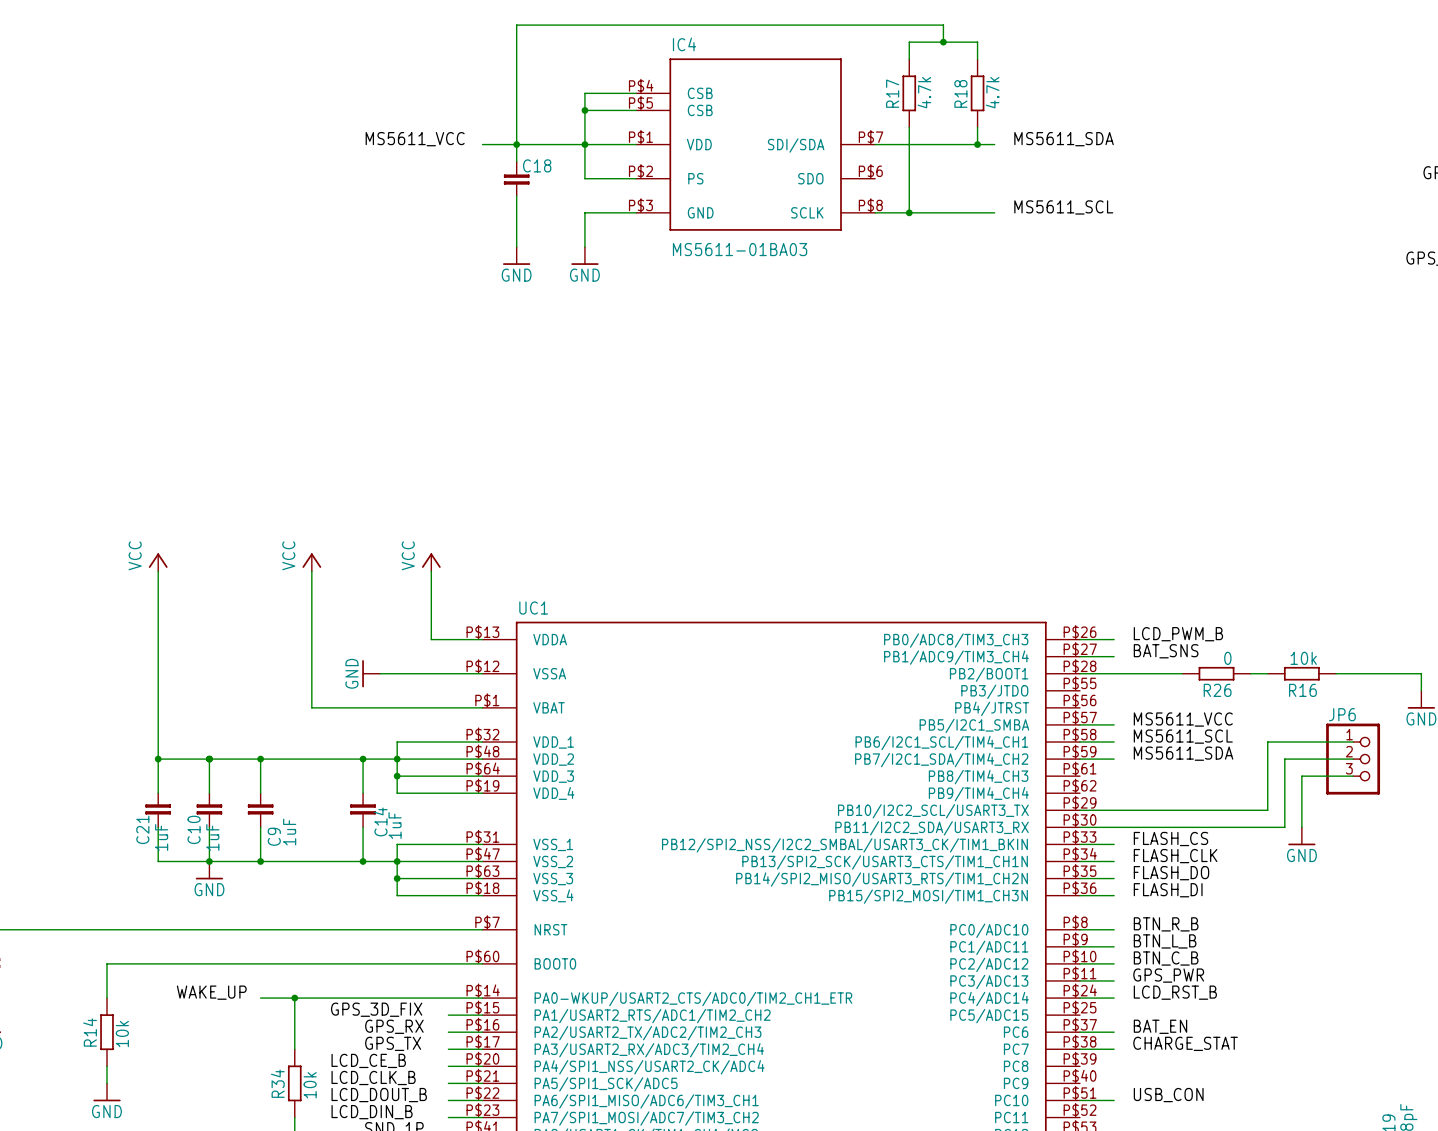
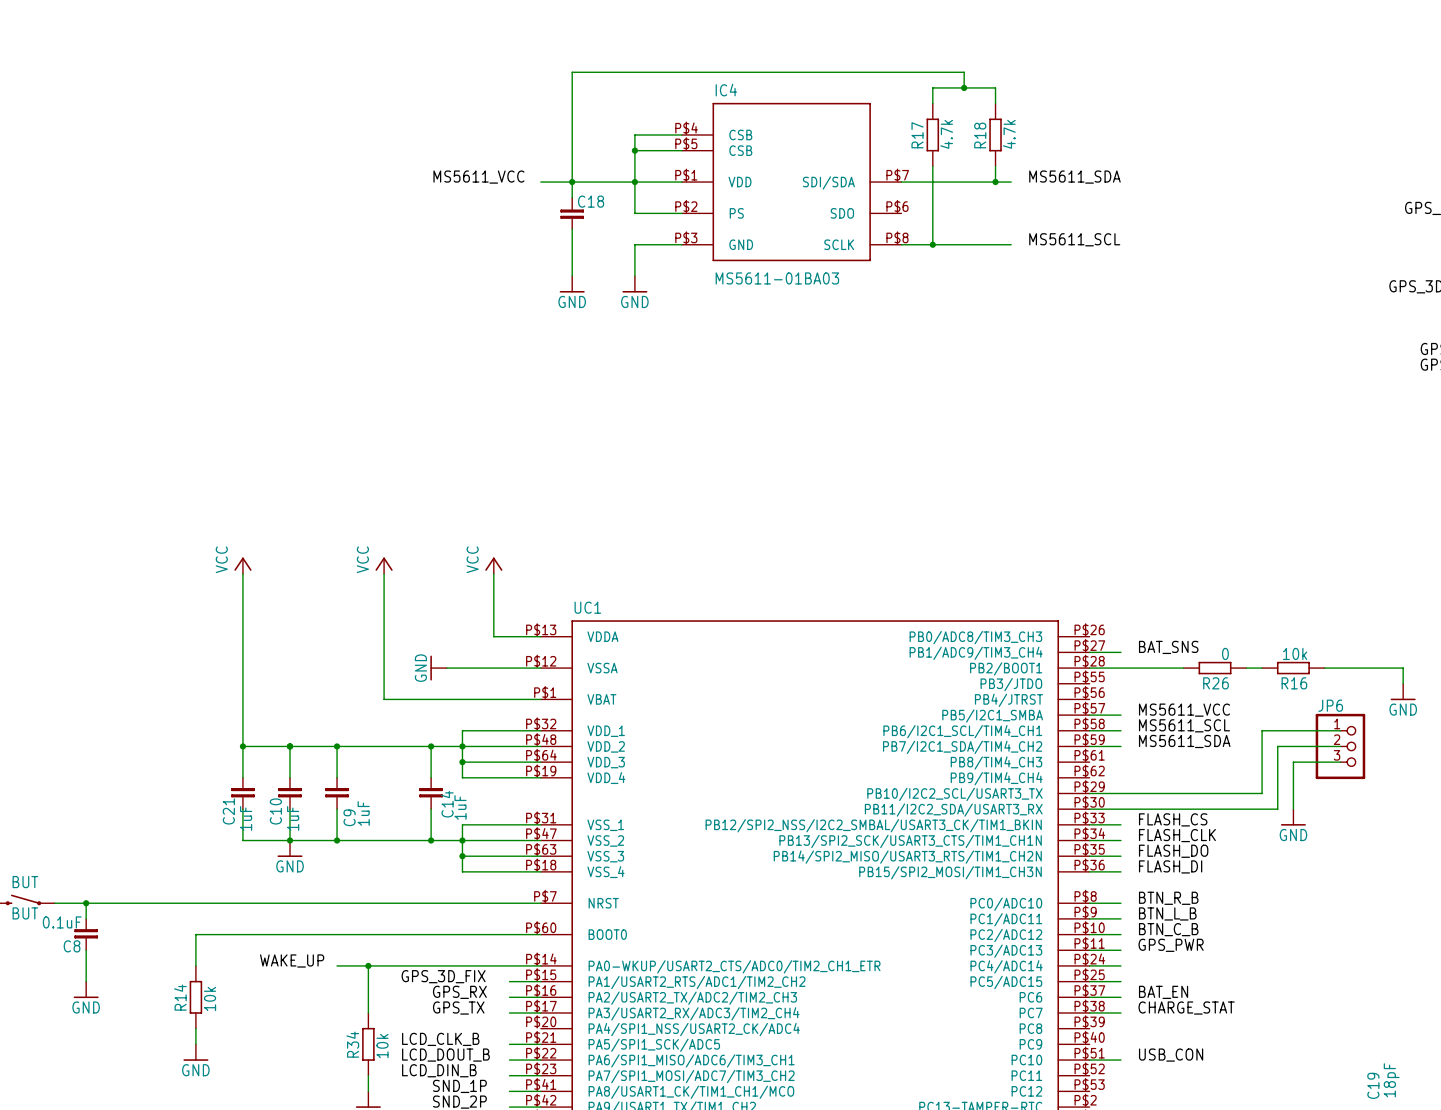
label: LCD_PWM_B (1178, 634) -> none
wire: (1079, 639) (1114, 639) -> none
label: LCD_RST_B (1175, 992) -> none
wire: none -> (1089, 981) (1120, 981)
label: LCD_CE_B (368, 1060) -> none
wire: (448, 1066) (482, 1066) -> none

